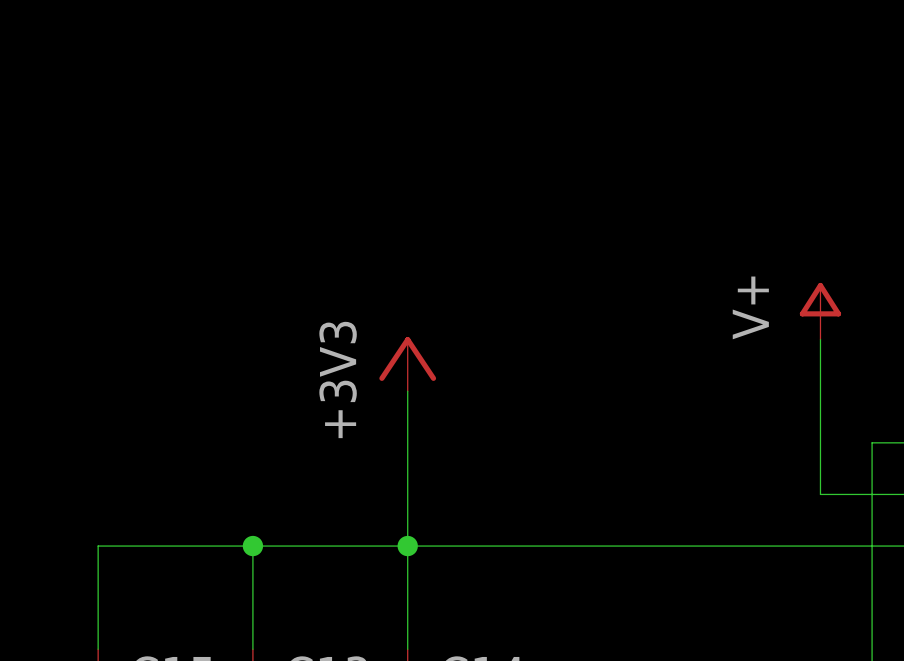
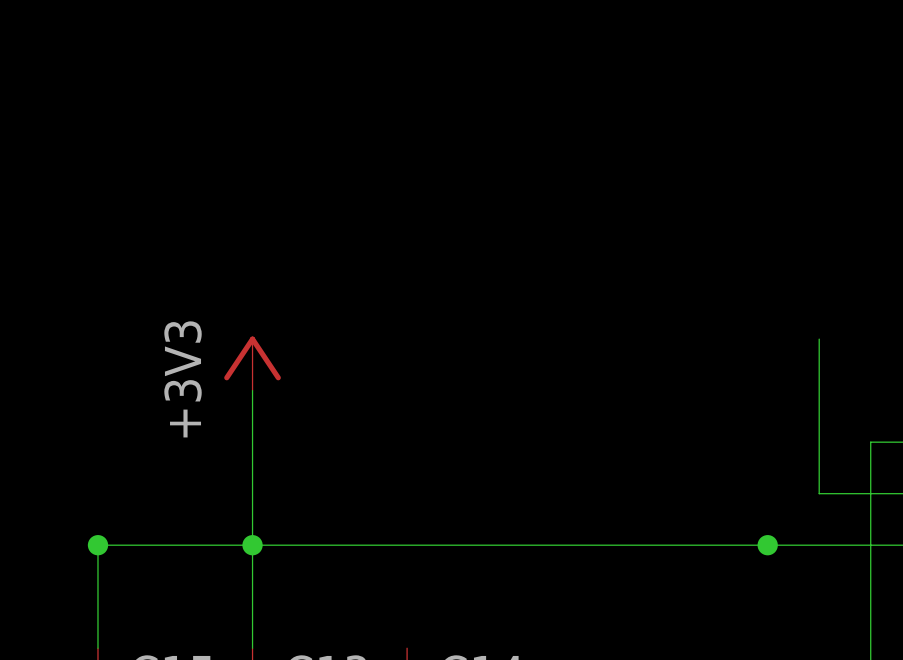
power symbol: V+ (820, 311) -> none
power symbol position: +3V3 (407, 364) -> +3V3 (252, 363)
wire: none -> (252, 390) (252, 545)
wire: (407, 391) (407, 649) -> none
junction: none -> (97, 545)
junction: (407, 546) -> none
junction: none -> (767, 545)

